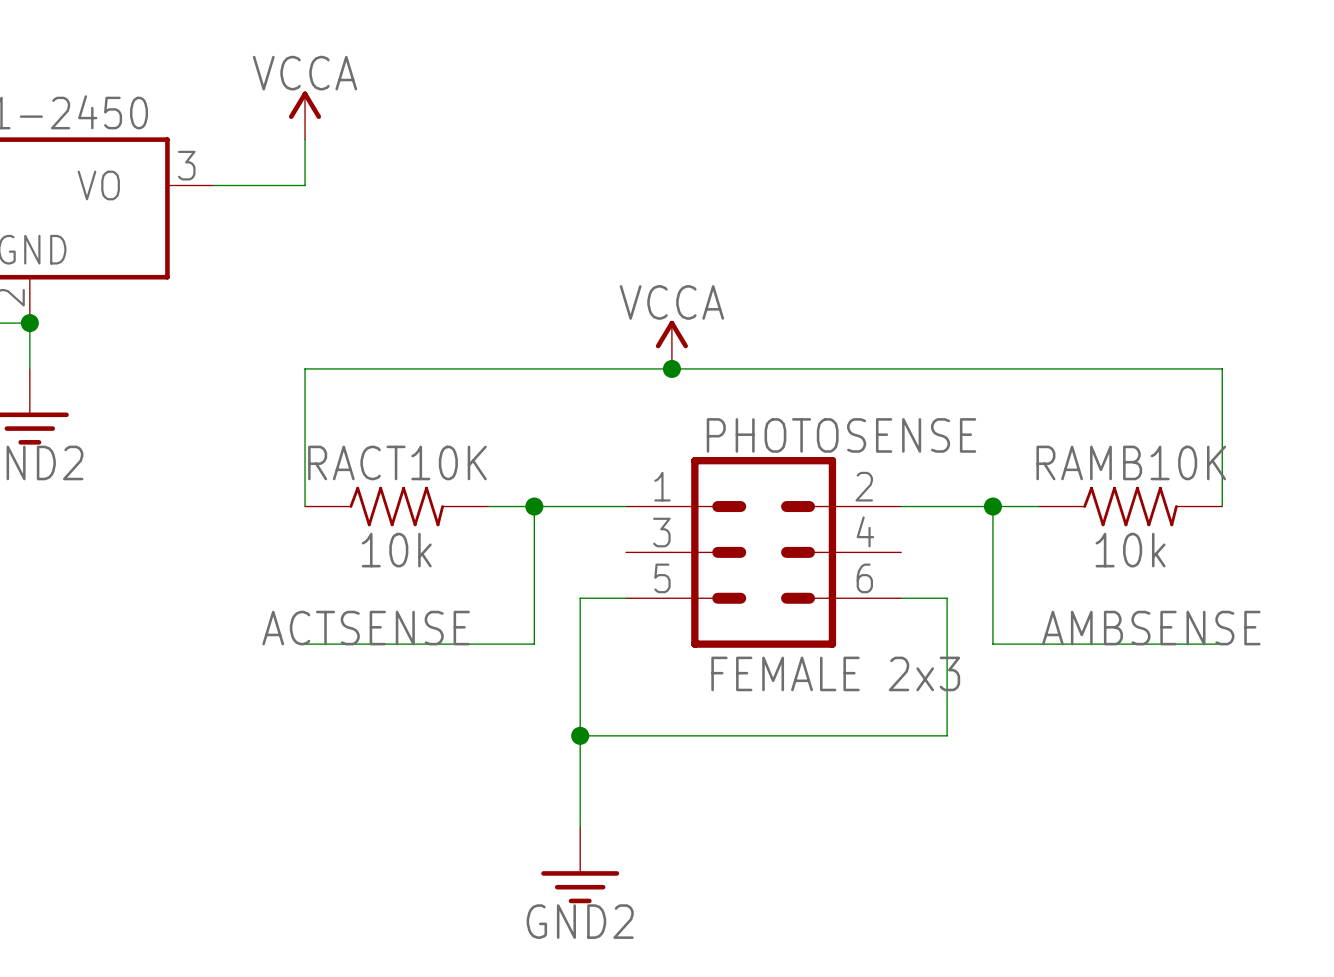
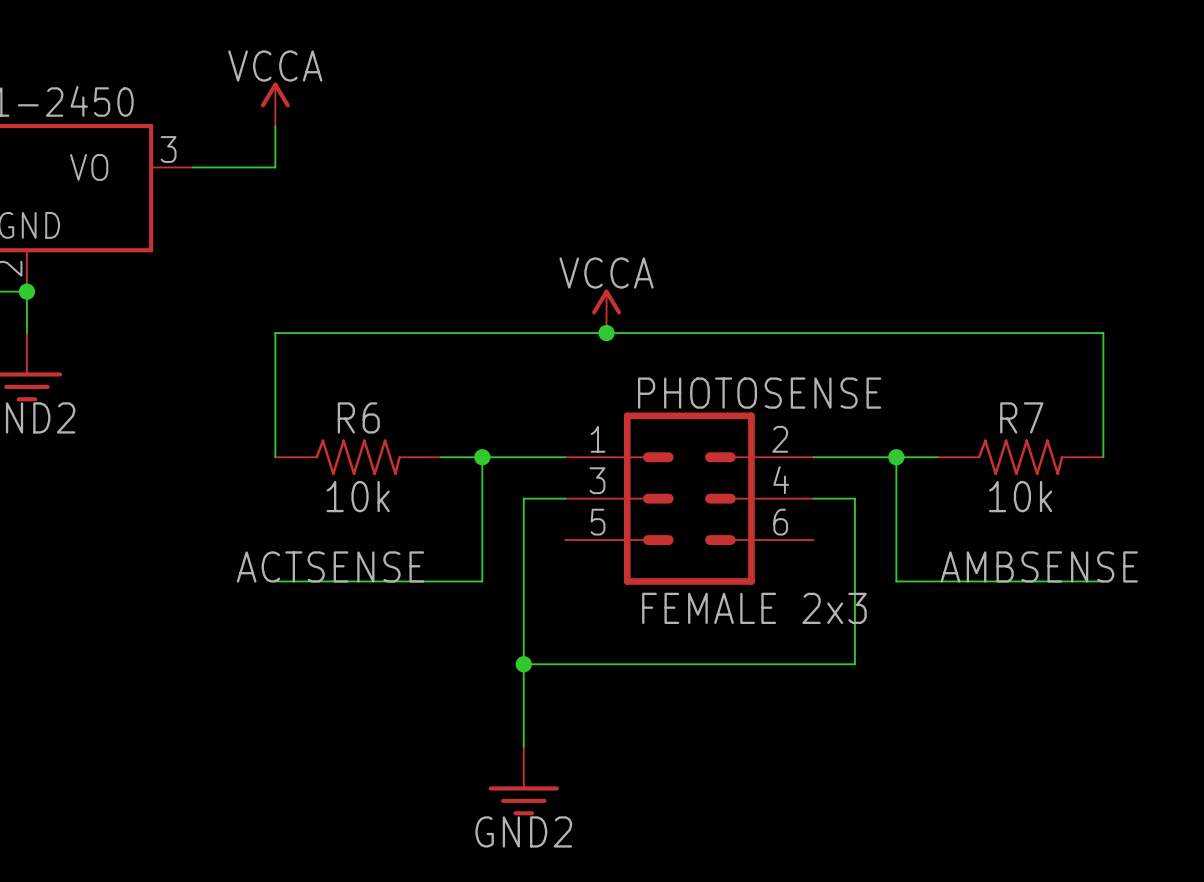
RACT10K name: RACT10K (397, 462) -> R6 (358, 417)
RAMB10K name: RAMB10K (1131, 462) -> R7 (1021, 417)
wire: (580, 598) (626, 598) -> (523, 540) (523, 498) (565, 498)
wire: (901, 598) (947, 598) -> (813, 498) (854, 498) (854, 540)

